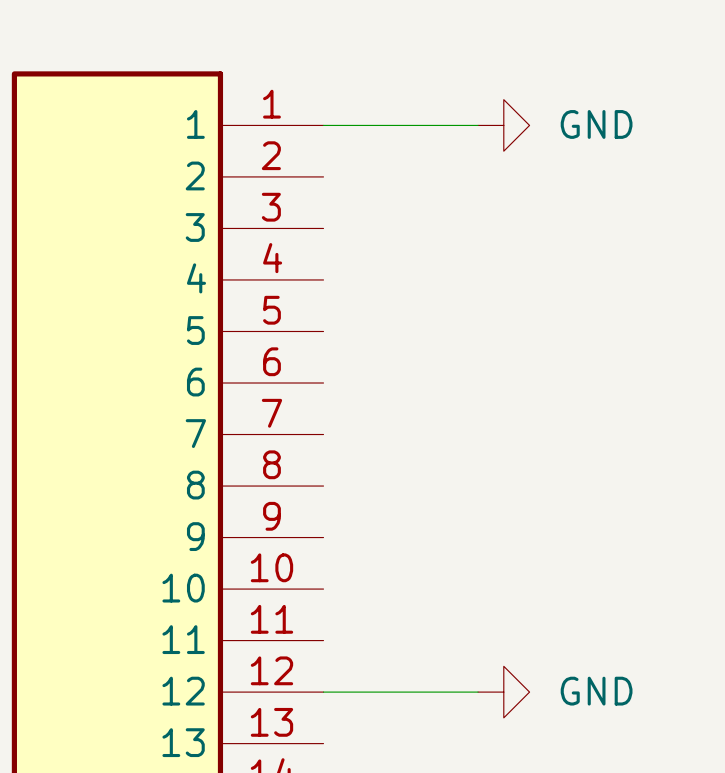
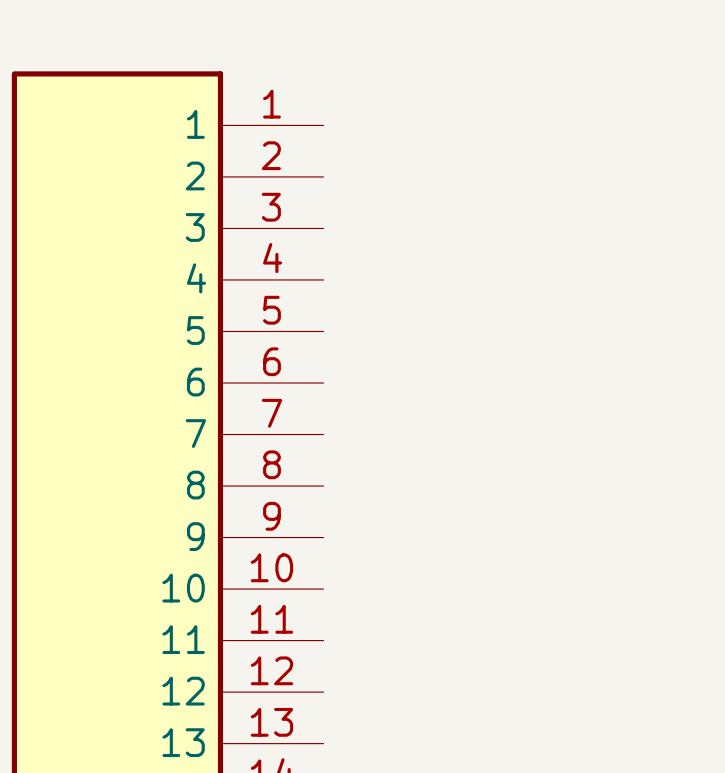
wire: (323, 125) (478, 125) -> none
power symbol: GND (503, 125) -> none
wire: (323, 692) (478, 692) -> none
power symbol: GND (503, 692) -> none

